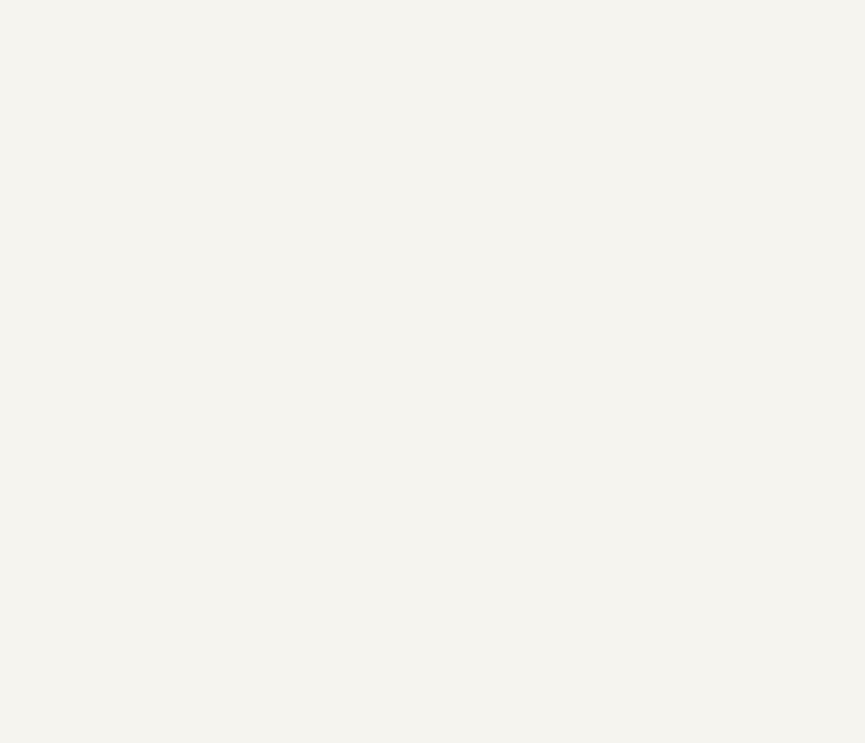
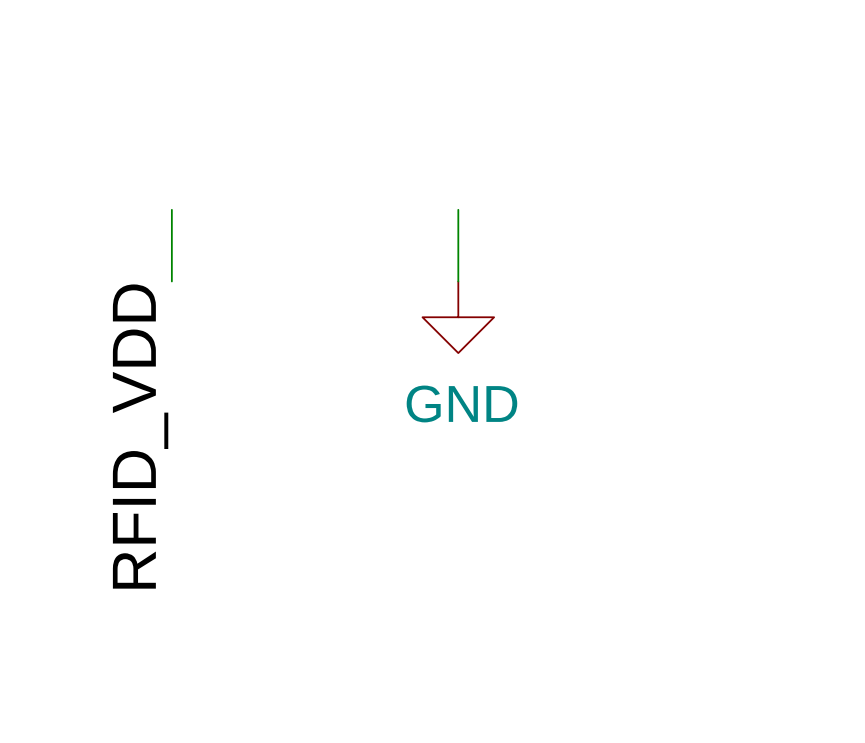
wire: none -> (171, 209) (171, 281)
wire: none -> (458, 209) (458, 281)
power symbol: none -> GND (458, 317)
label: none -> RFID_VDD (140, 436)

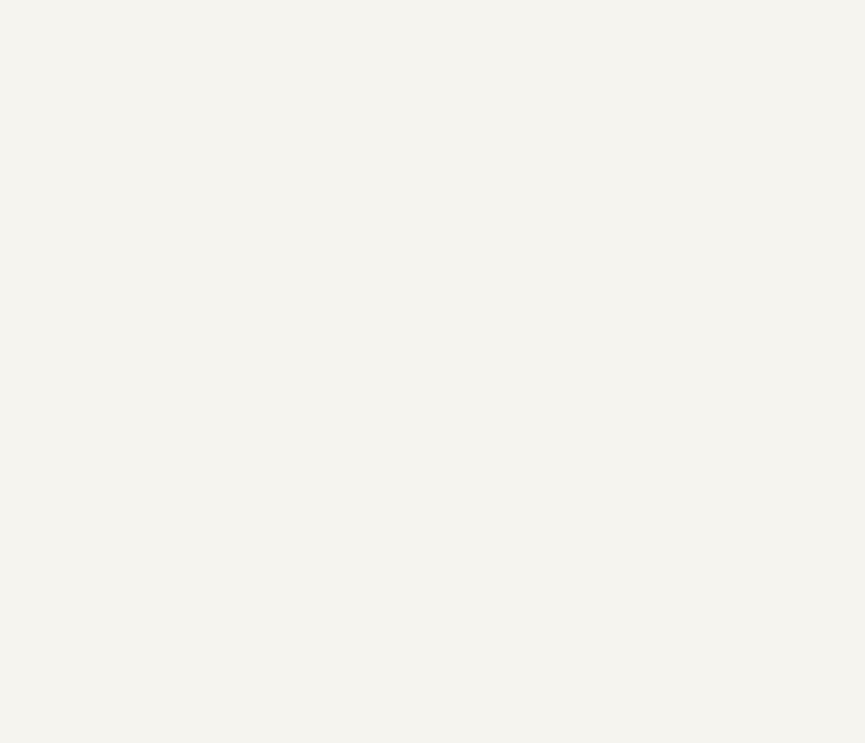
wire: (171, 209) (171, 281) -> none
wire: (458, 209) (458, 281) -> none
power symbol: GND (458, 317) -> none
label: RFID_VDD (140, 436) -> none

